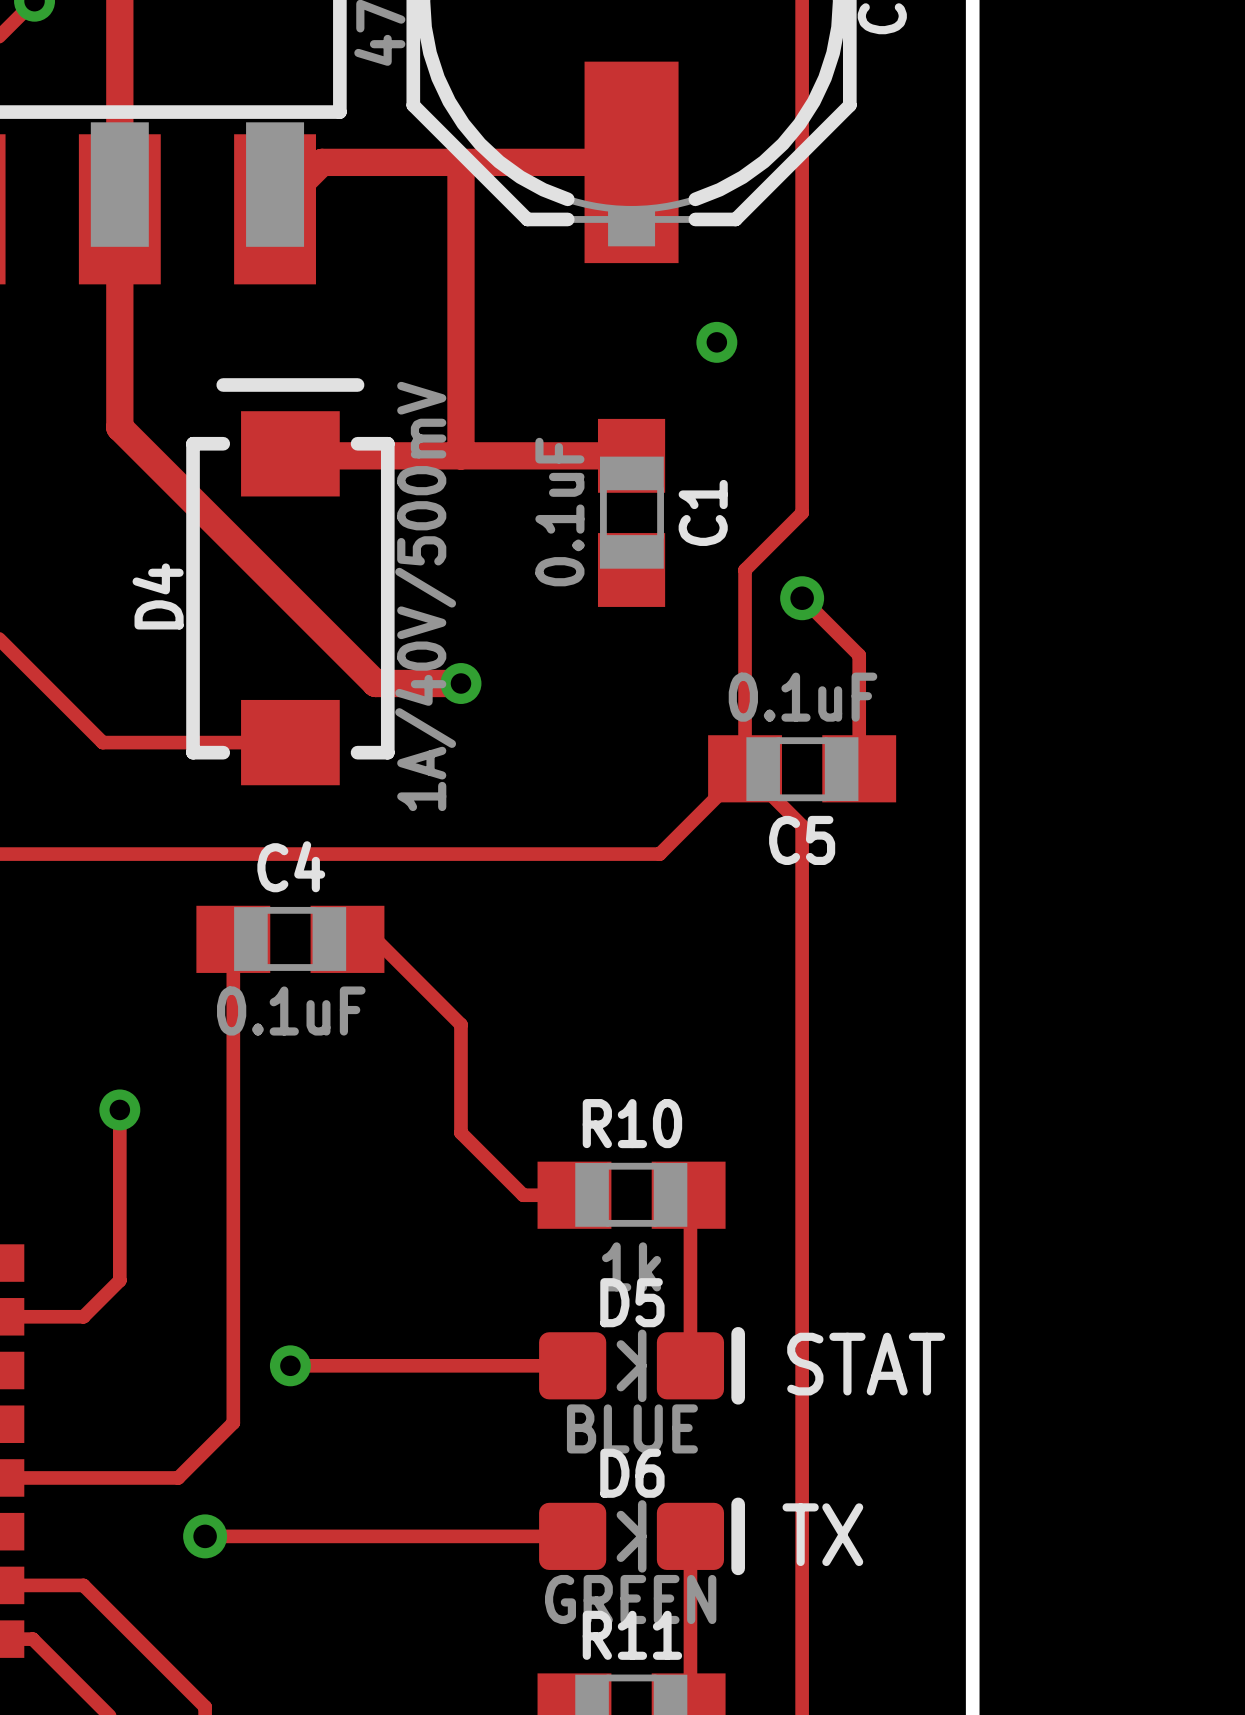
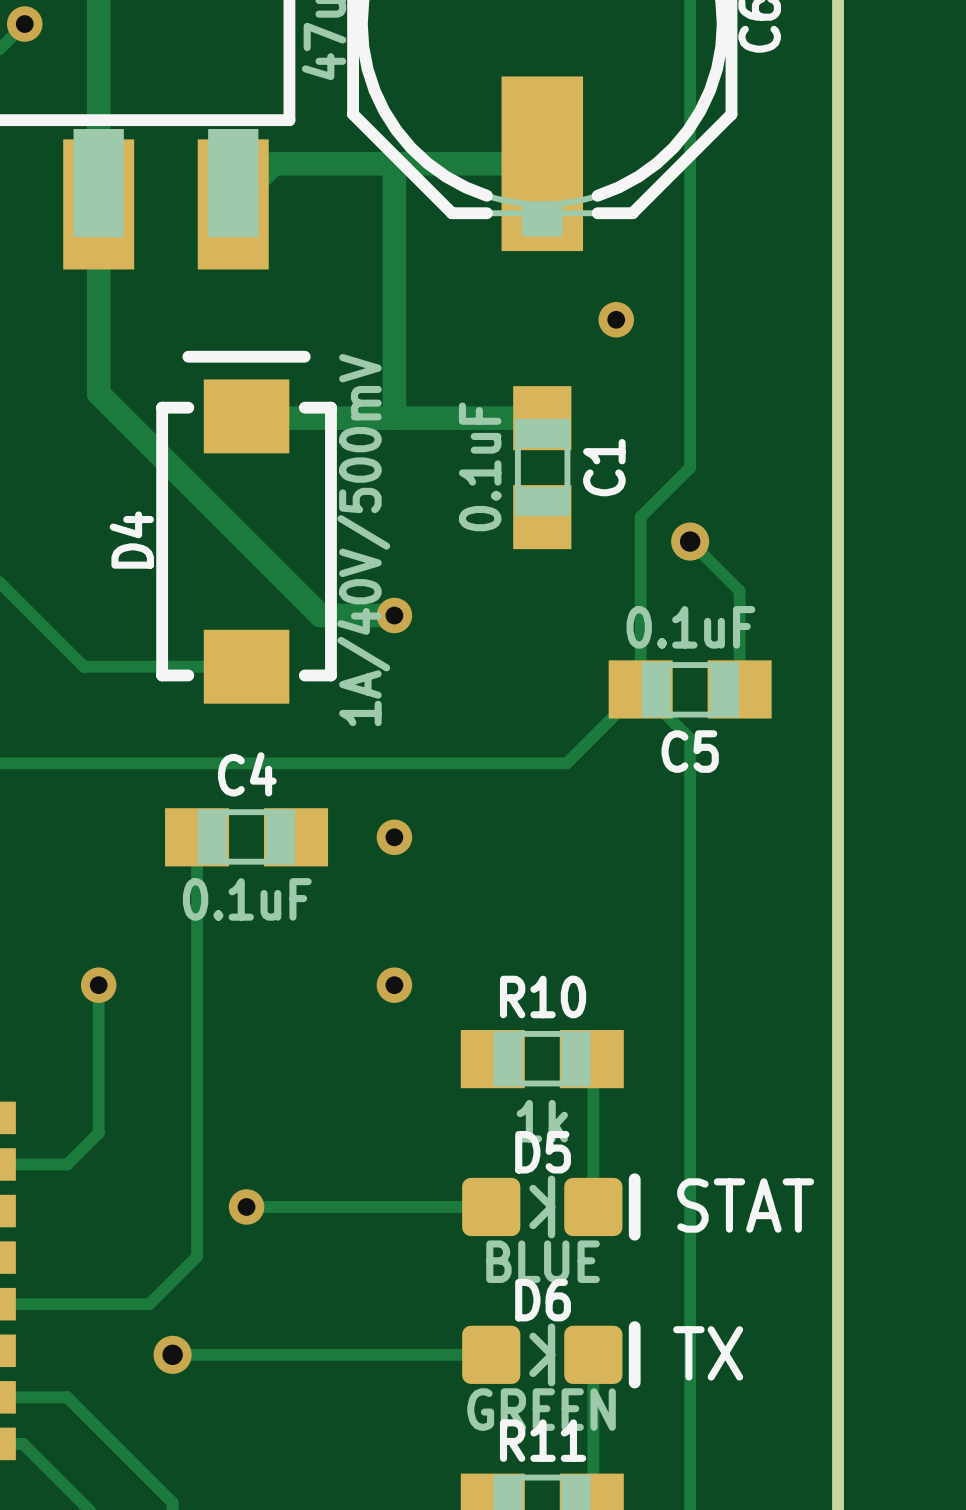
track: (375, 939) (460, 1024) (460, 1132) (523, 1195) (574, 1195) -> none
via: none -> (394, 837)
via: none -> (394, 985)

